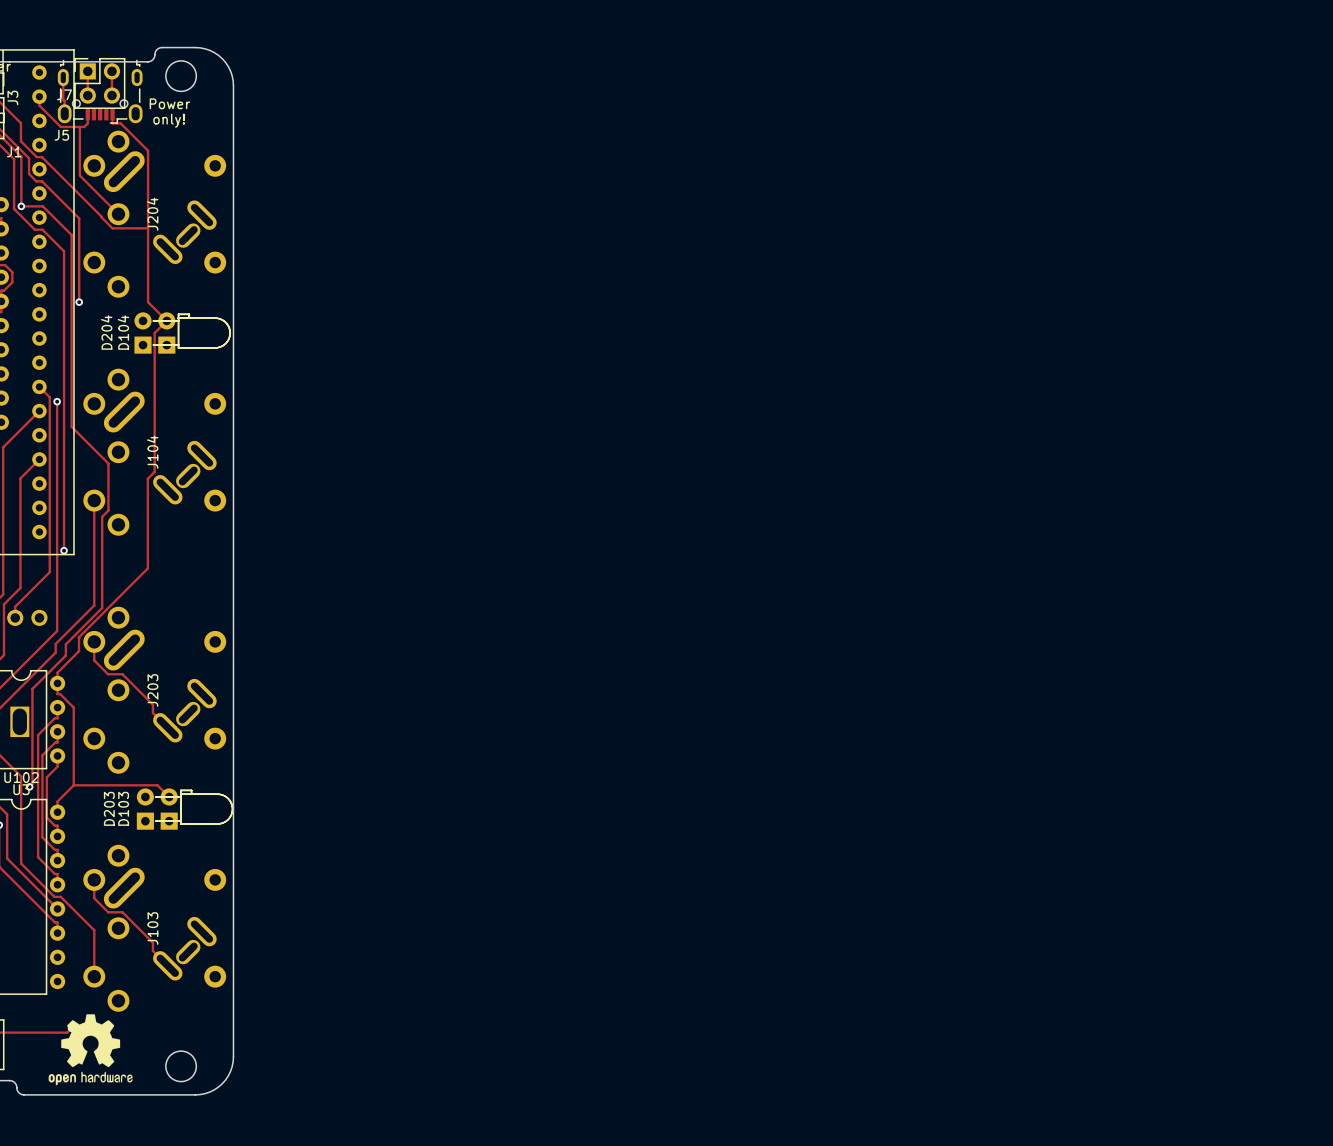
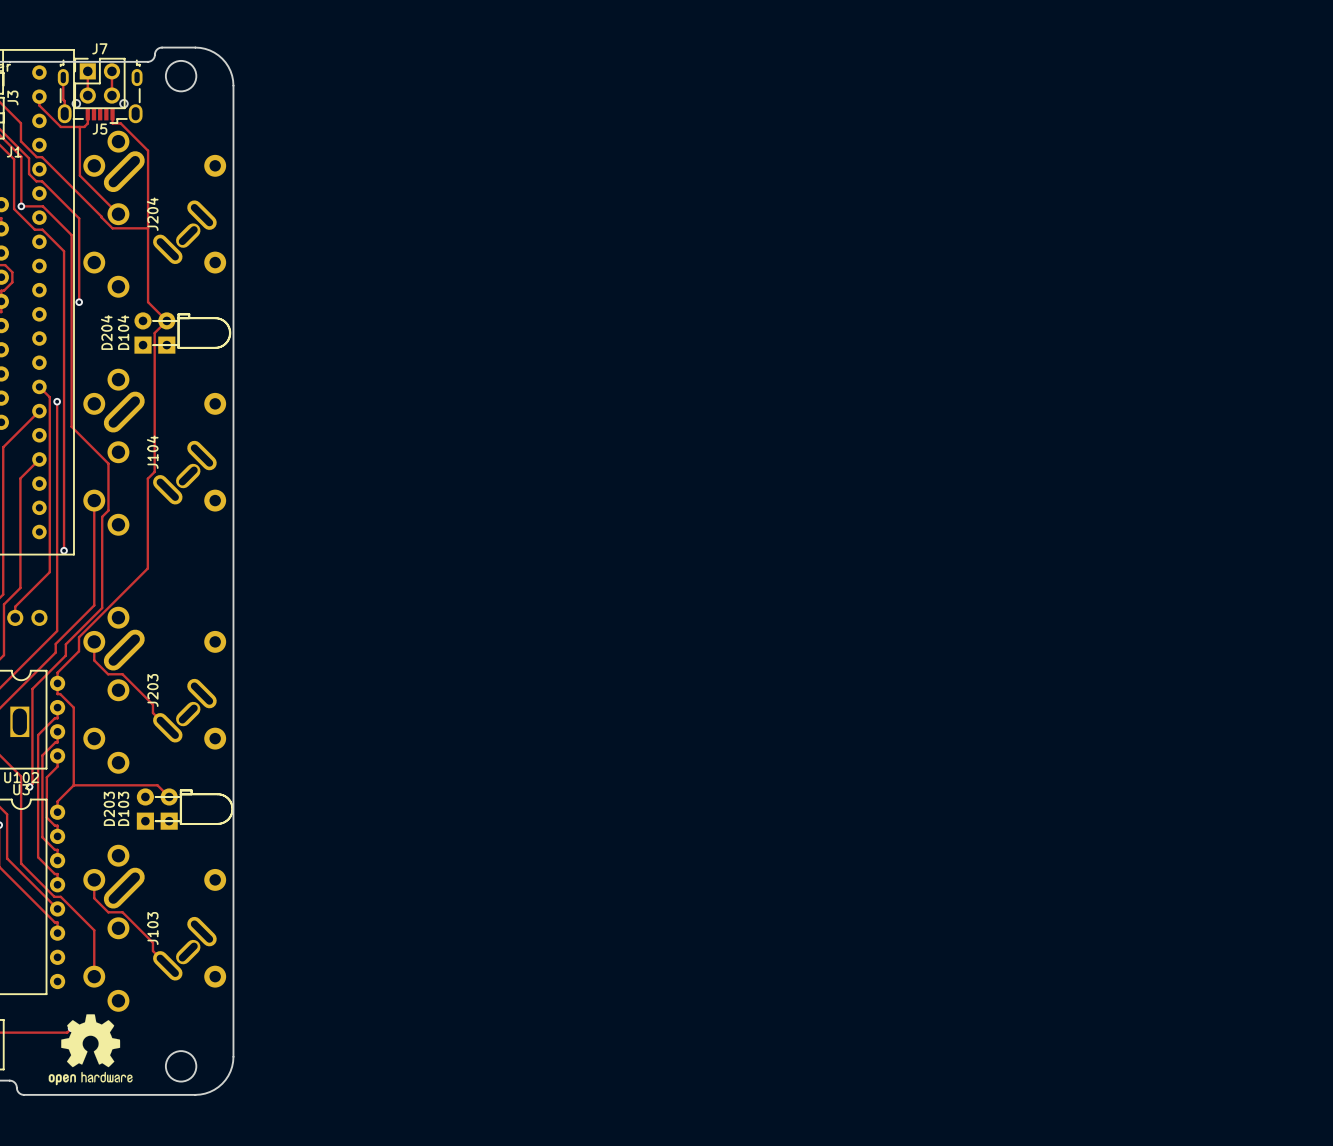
J7 name position: J7 (64, 94) -> J7 (99, 48)
text: Power (169, 103) -> none
text: only! (169, 120) -> none
J5 name position: J5 (61, 135) -> J5 (99, 129)

